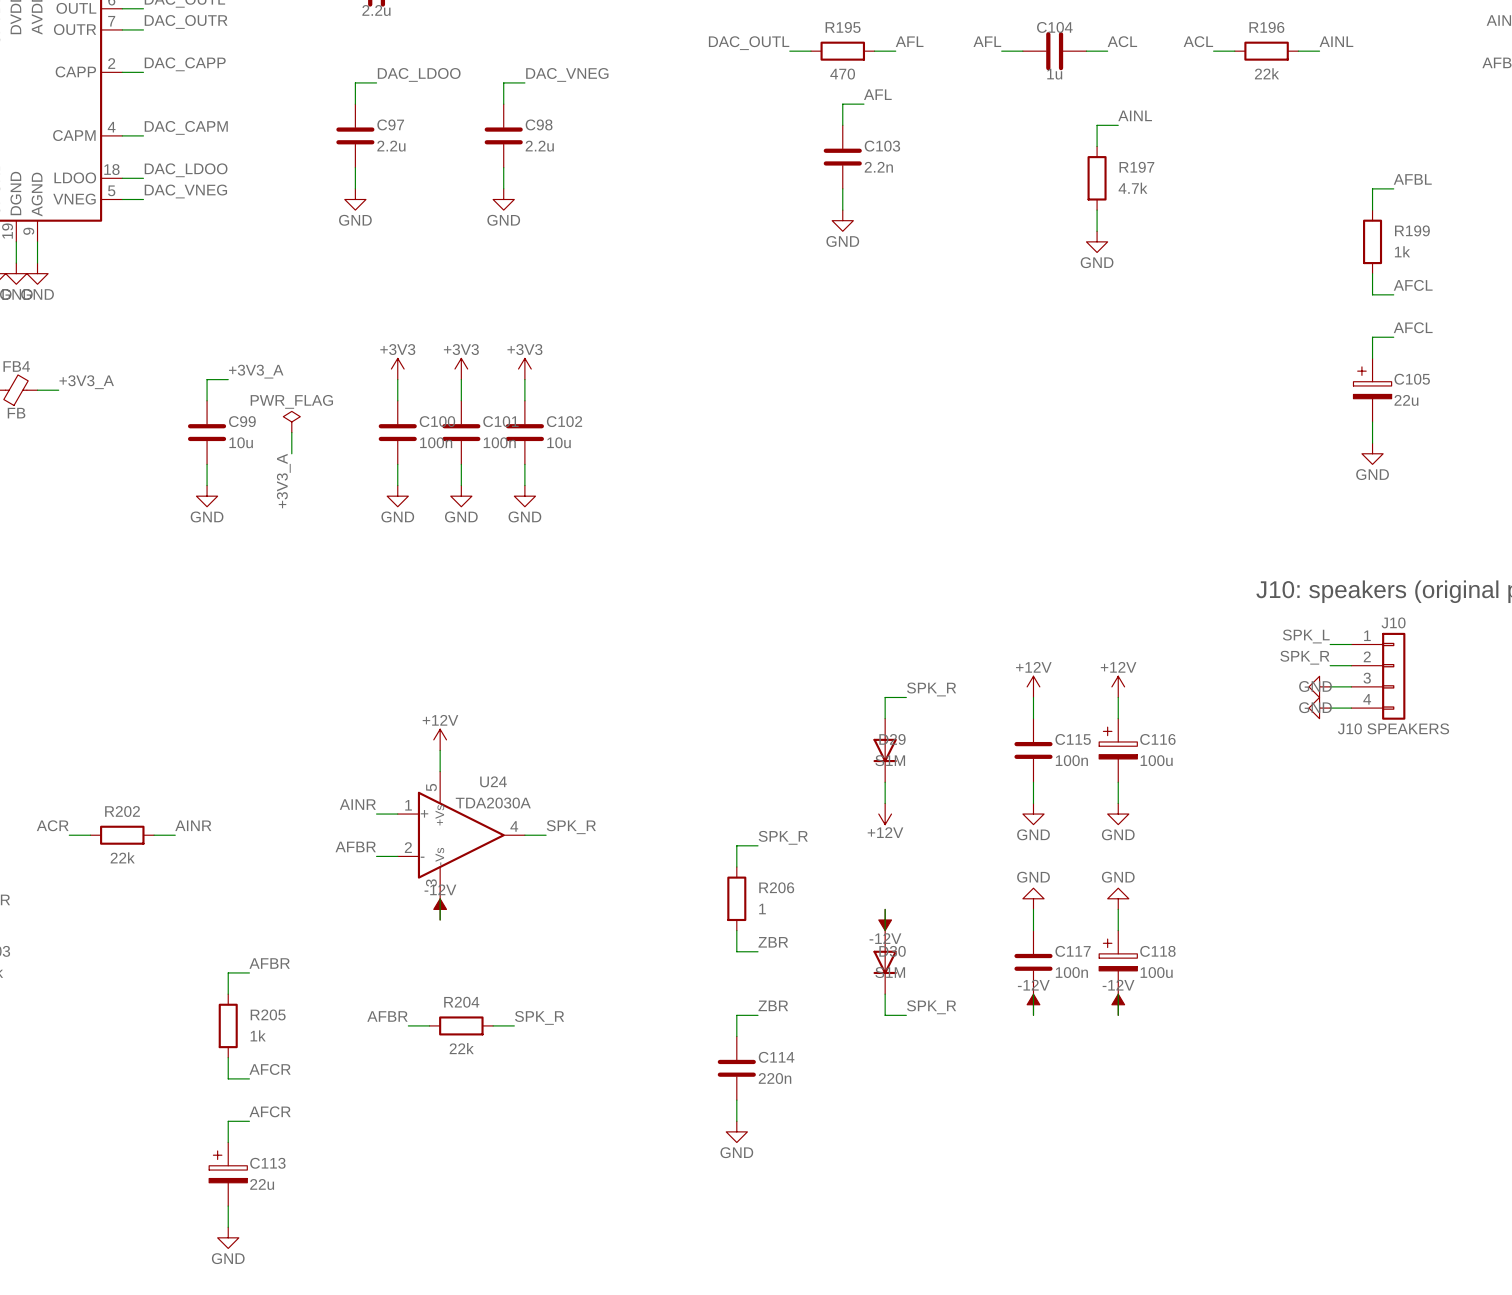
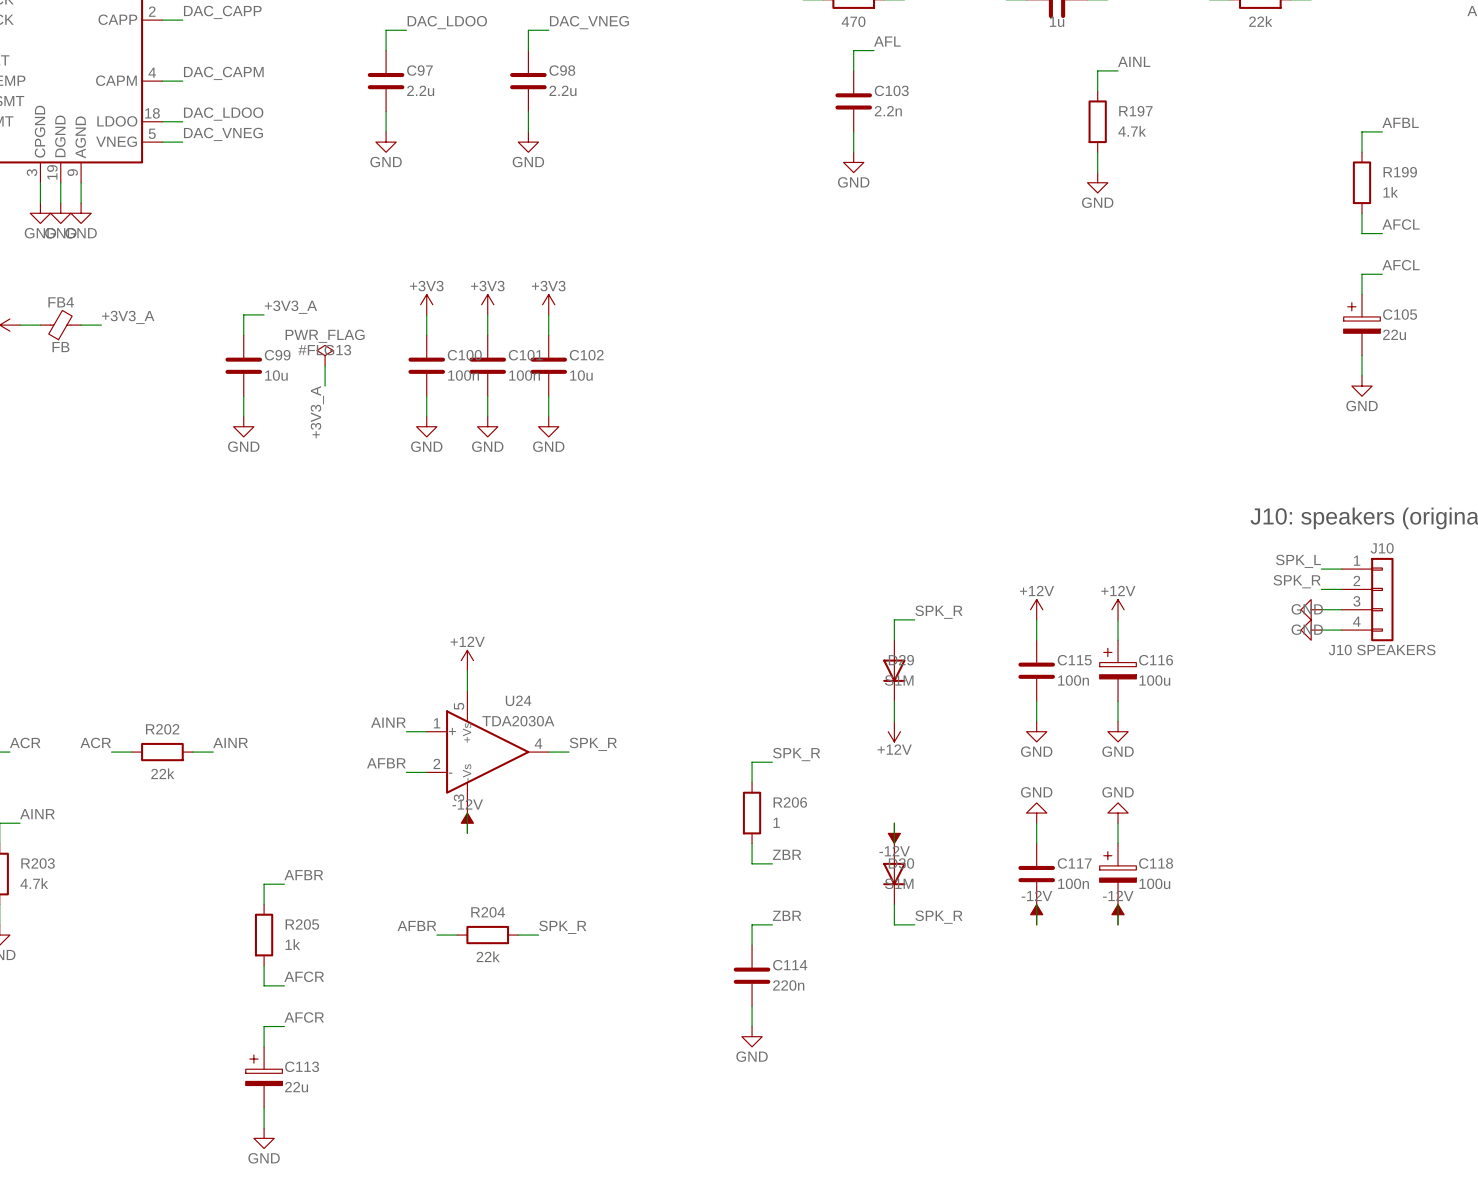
#FLG13 name: none -> #FLG13 (324, 350)

